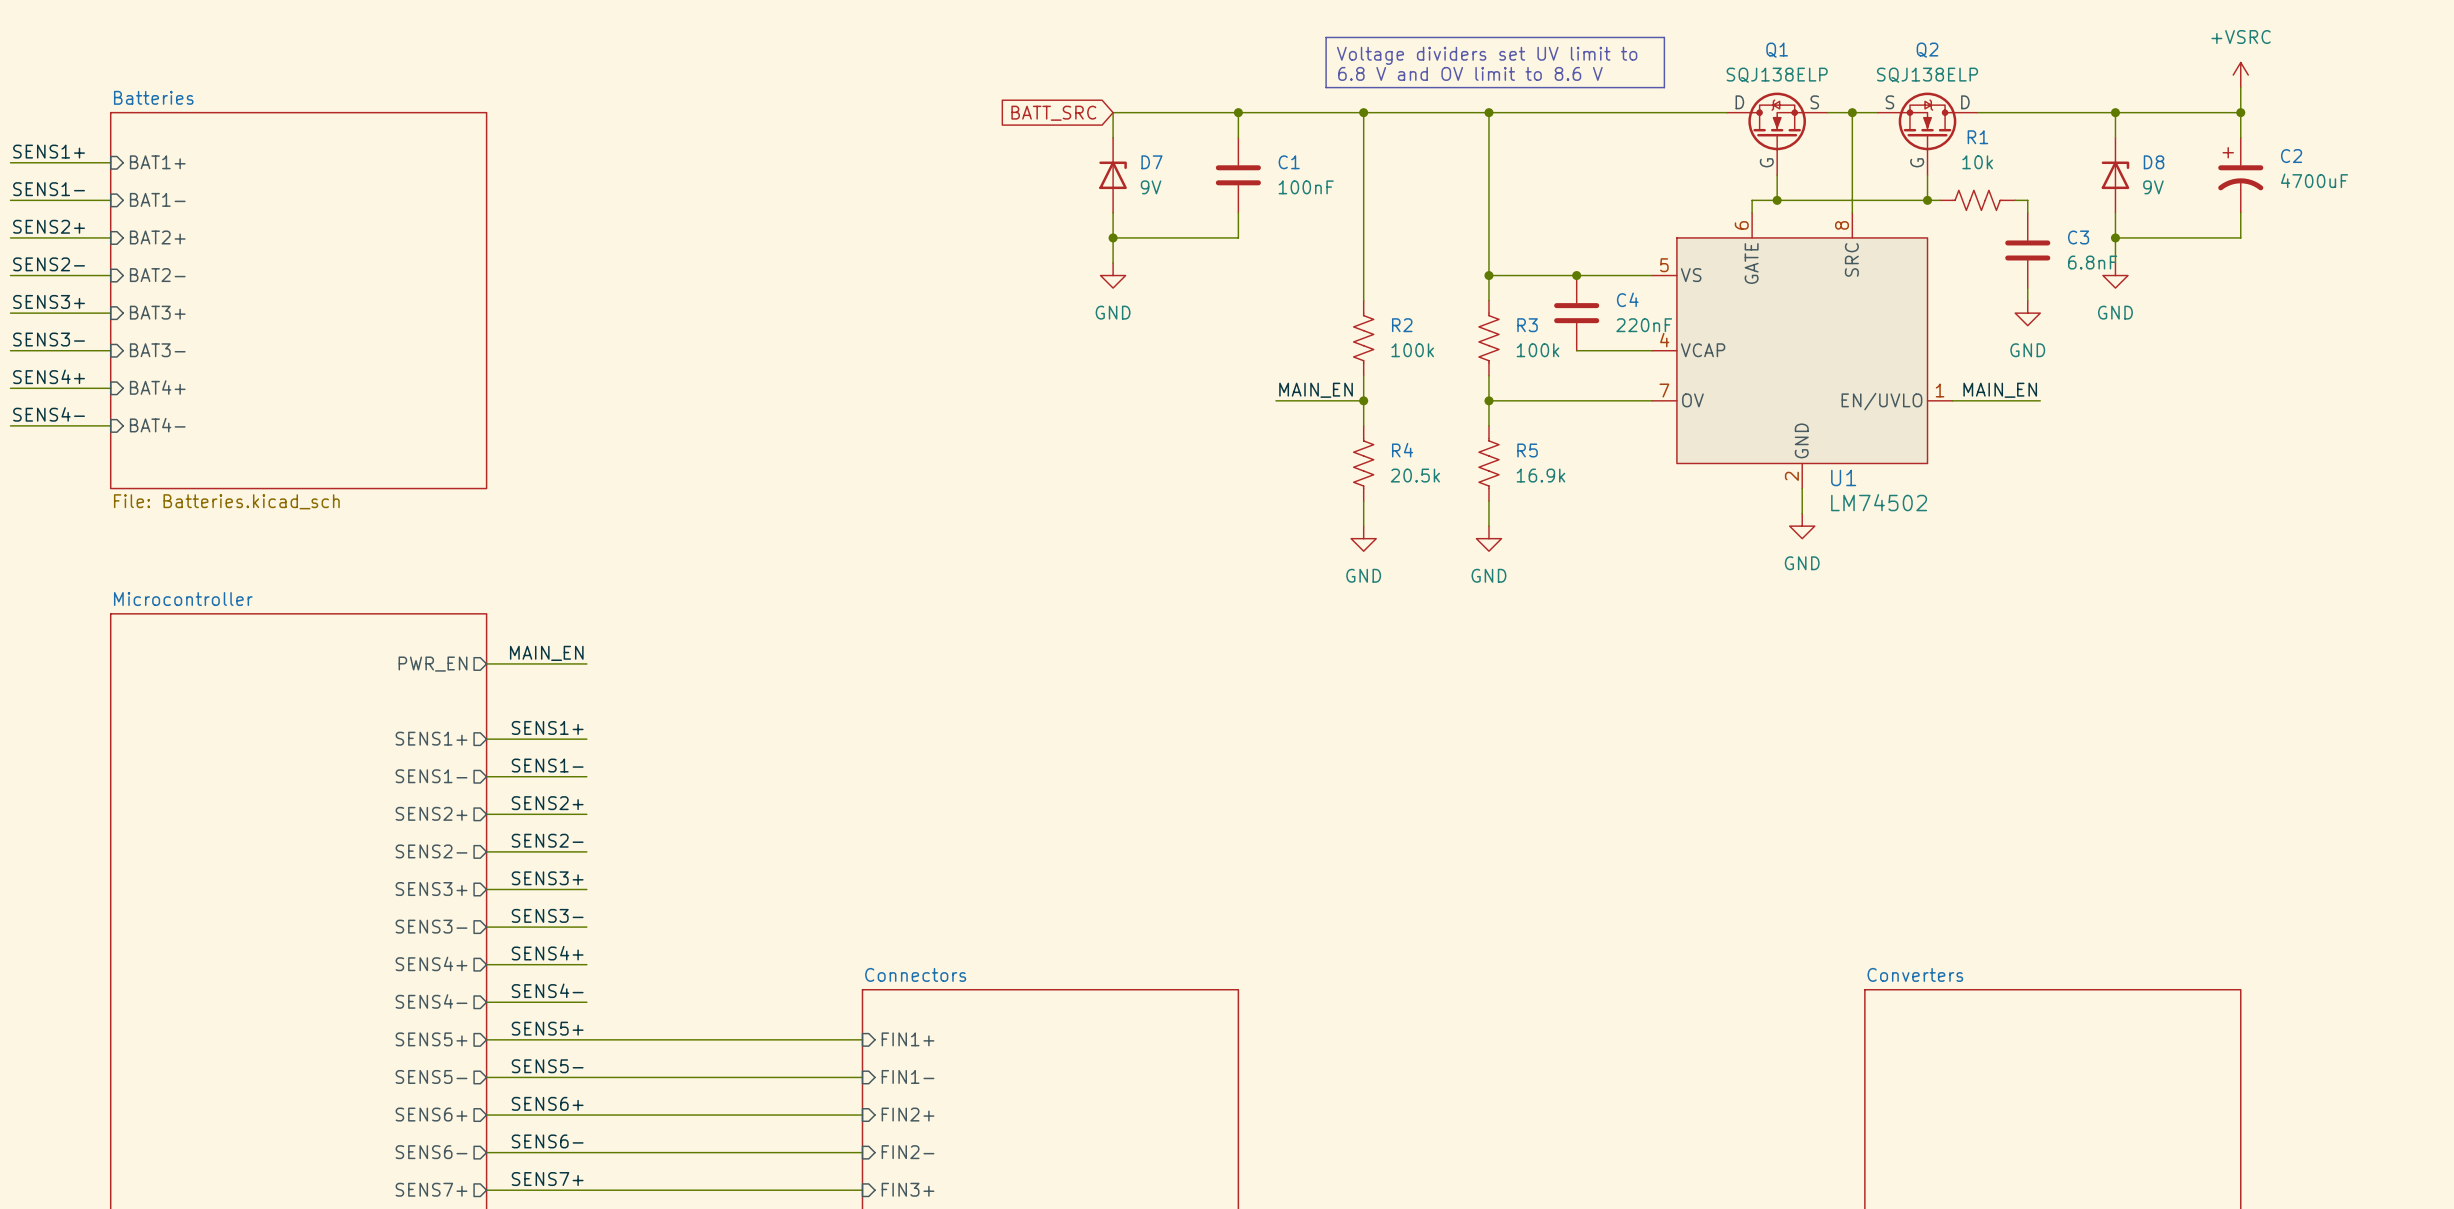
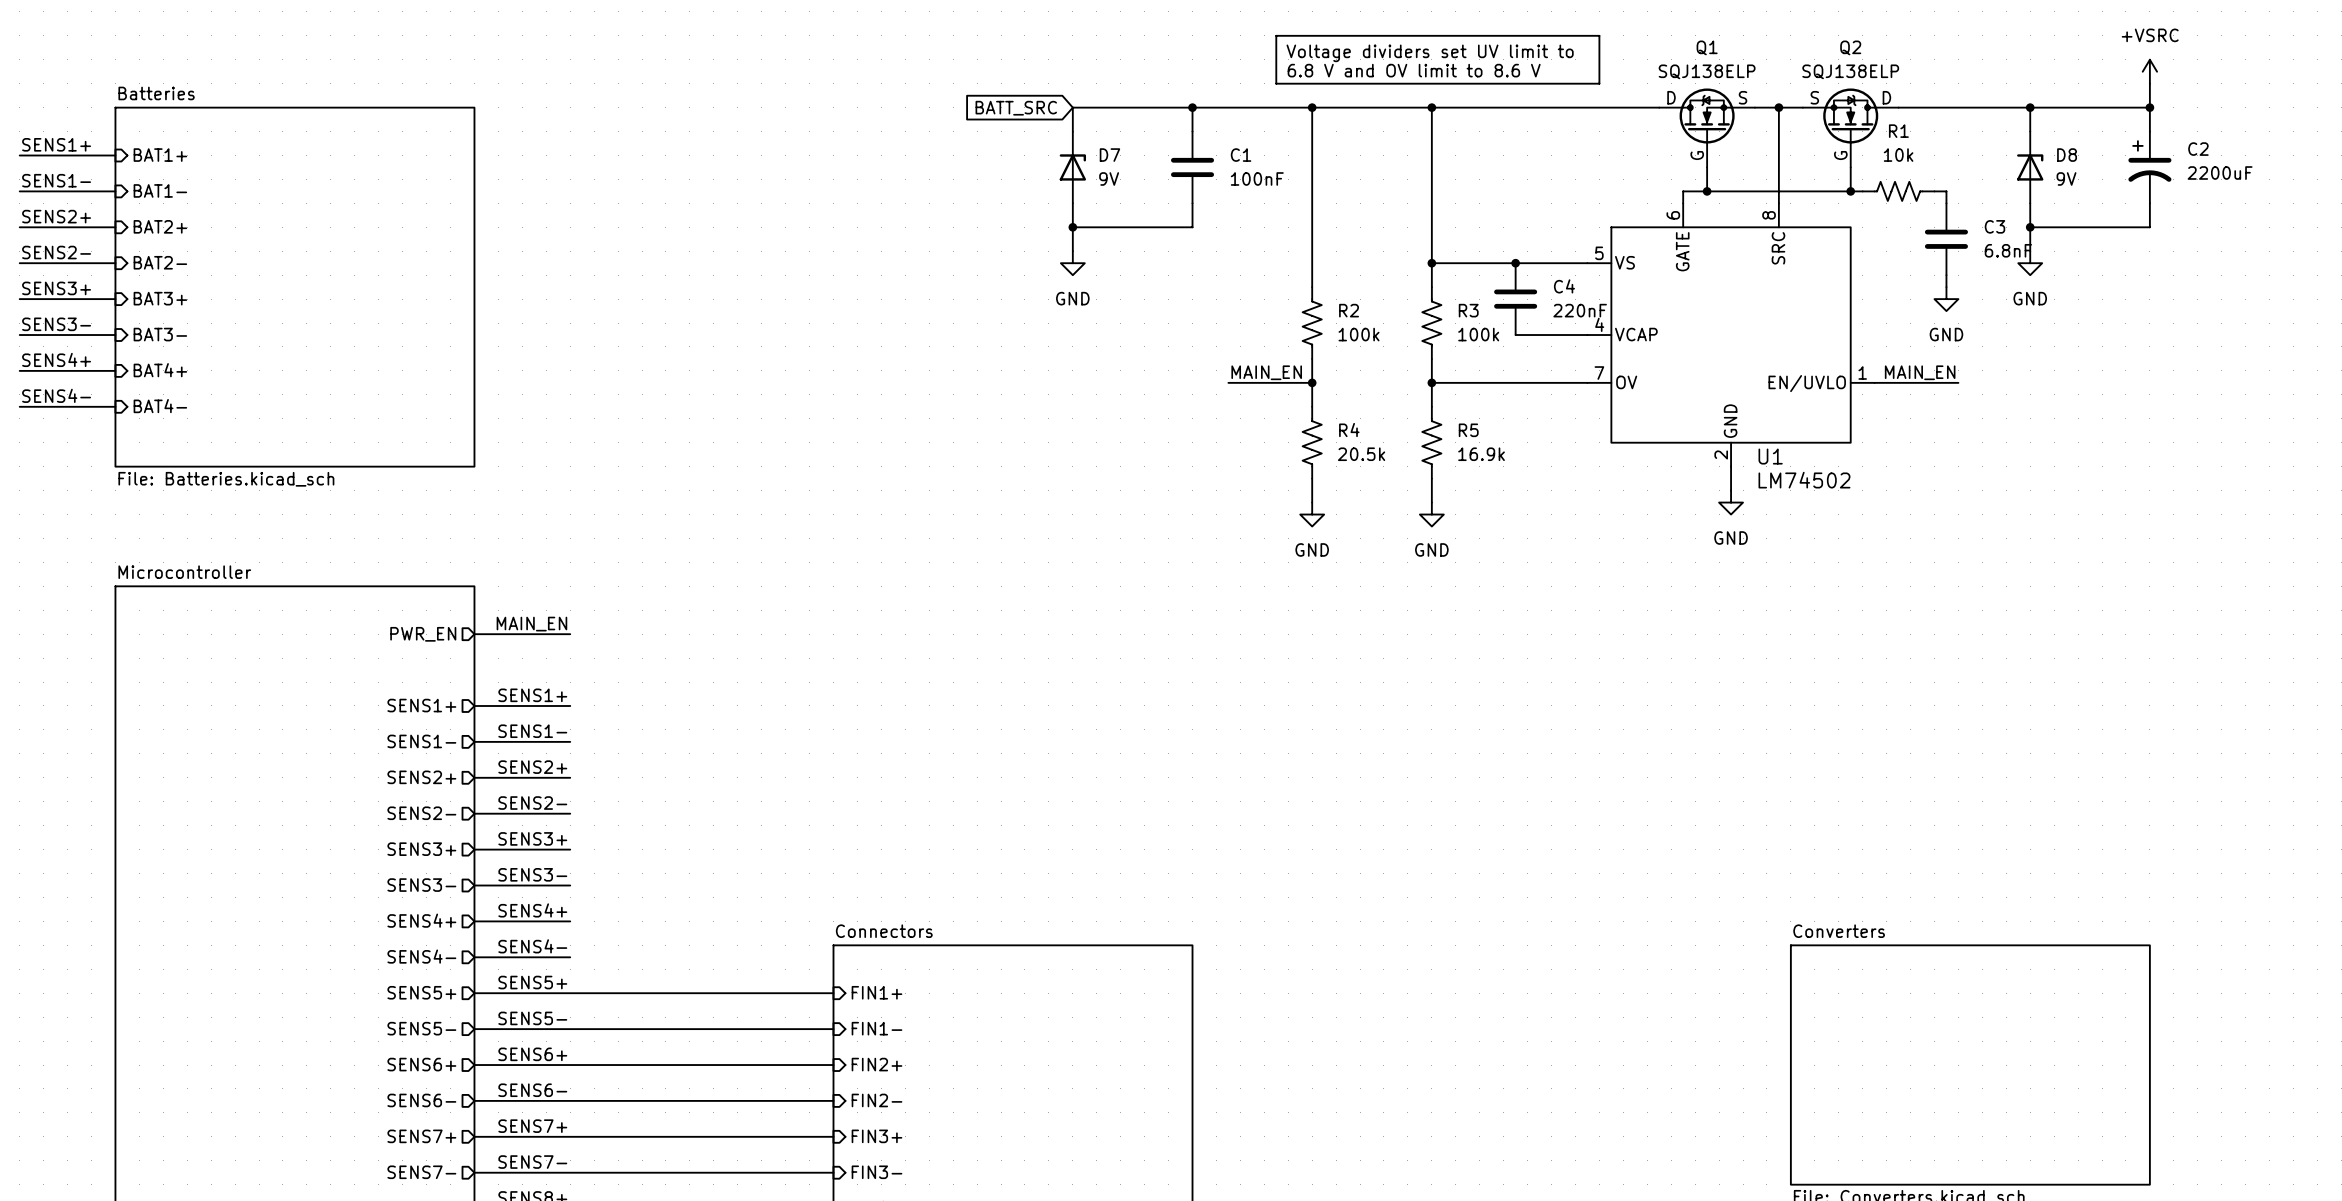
C2 value: 4700uF (2314, 180) -> 2200uF (2220, 173)

